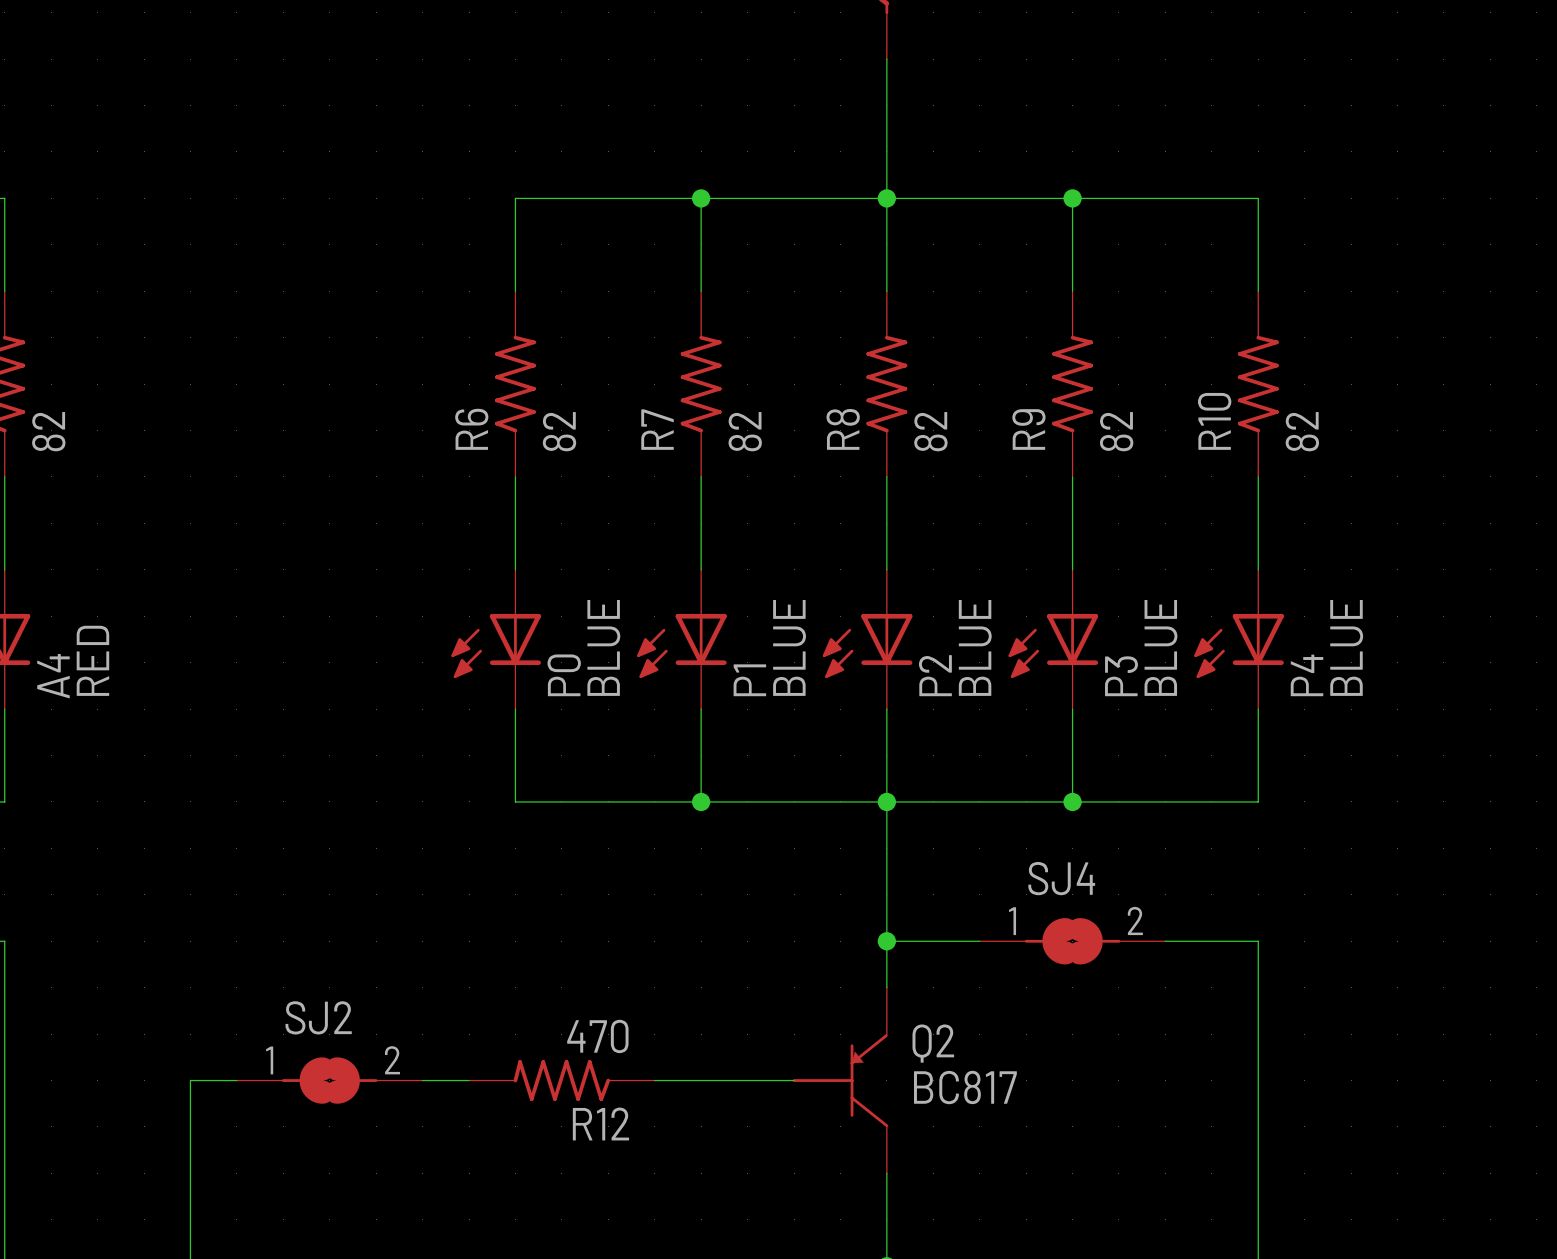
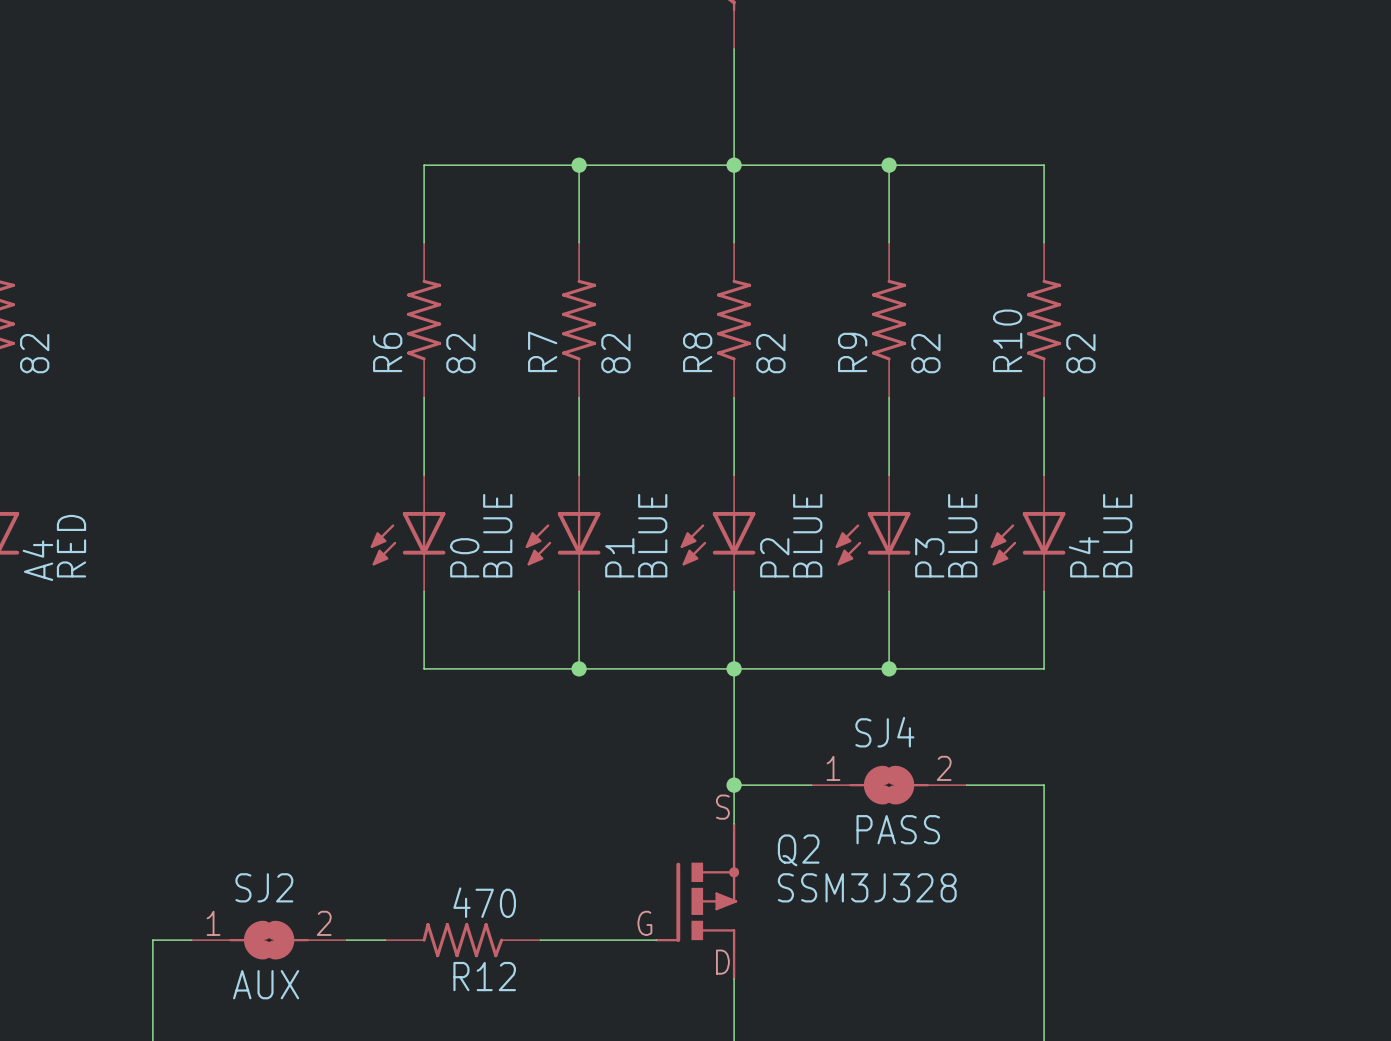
Q2 symbol: [792, 987, 889, 1174] -> [655, 822, 740, 981]
SJ4 value: none -> PASS (898, 829)
wire: (236, 1080) (190, 1080) (190, 1126) -> (191, 940) (152, 940)
SJ2 position: (329, 1080) -> (269, 940)
wire: (422, 1080) (469, 1080) -> (346, 940) (385, 940)
R12 position: (561, 1080) -> (462, 940)
wire: (654, 1080) (794, 1080) -> (540, 940) (656, 940)
Q2 value: BC817 (965, 1087) -> SSM3J328 (867, 887)
SJ2 value: none -> AUX (266, 984)

